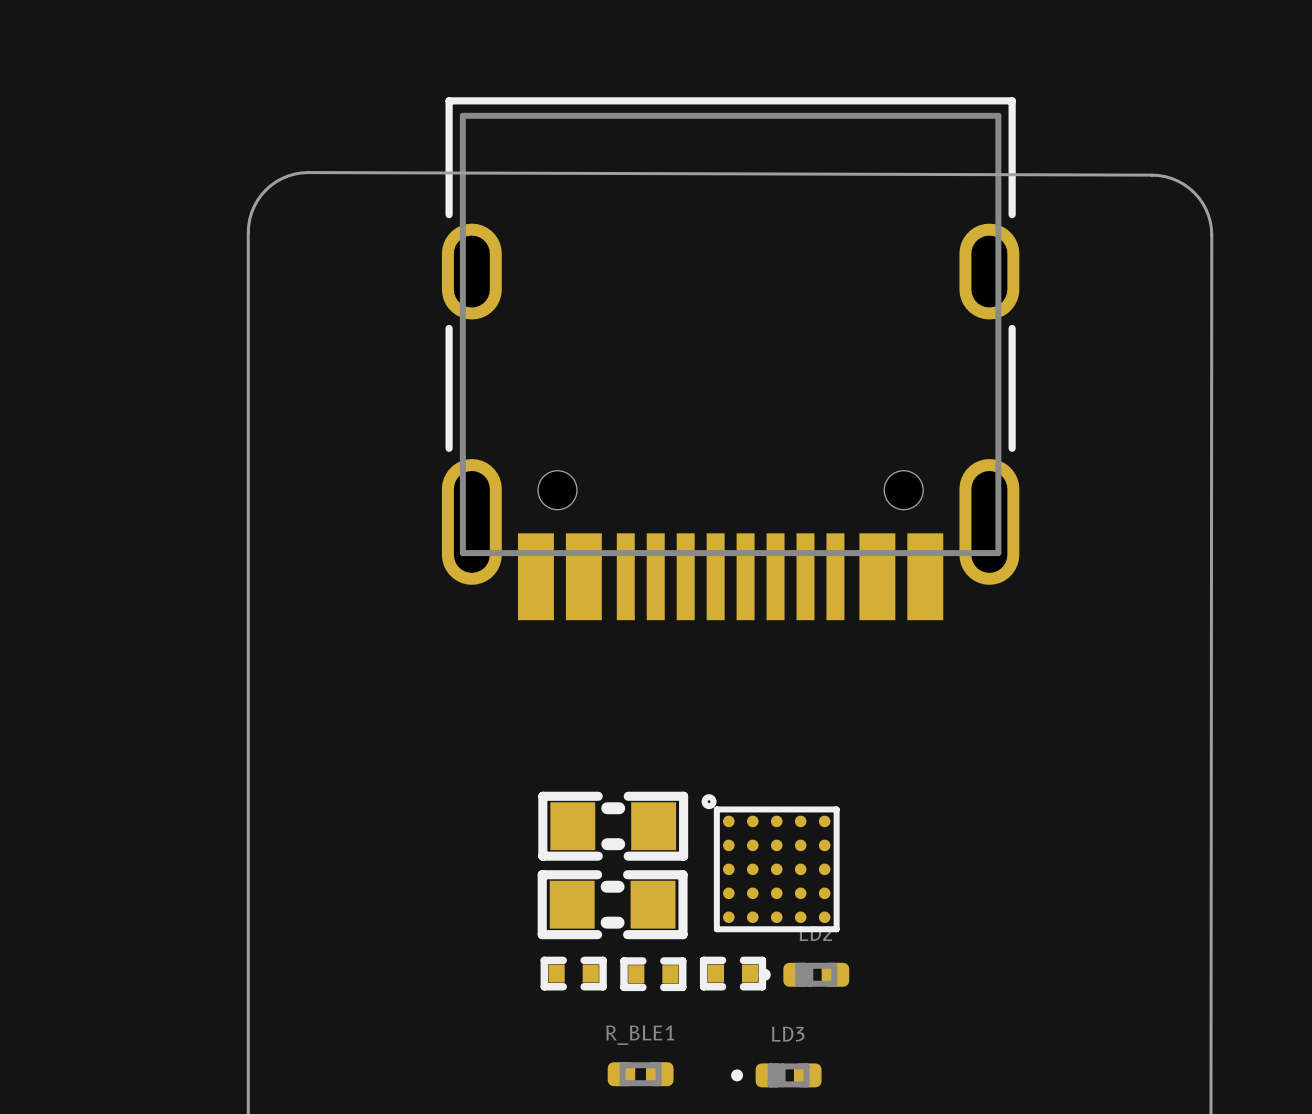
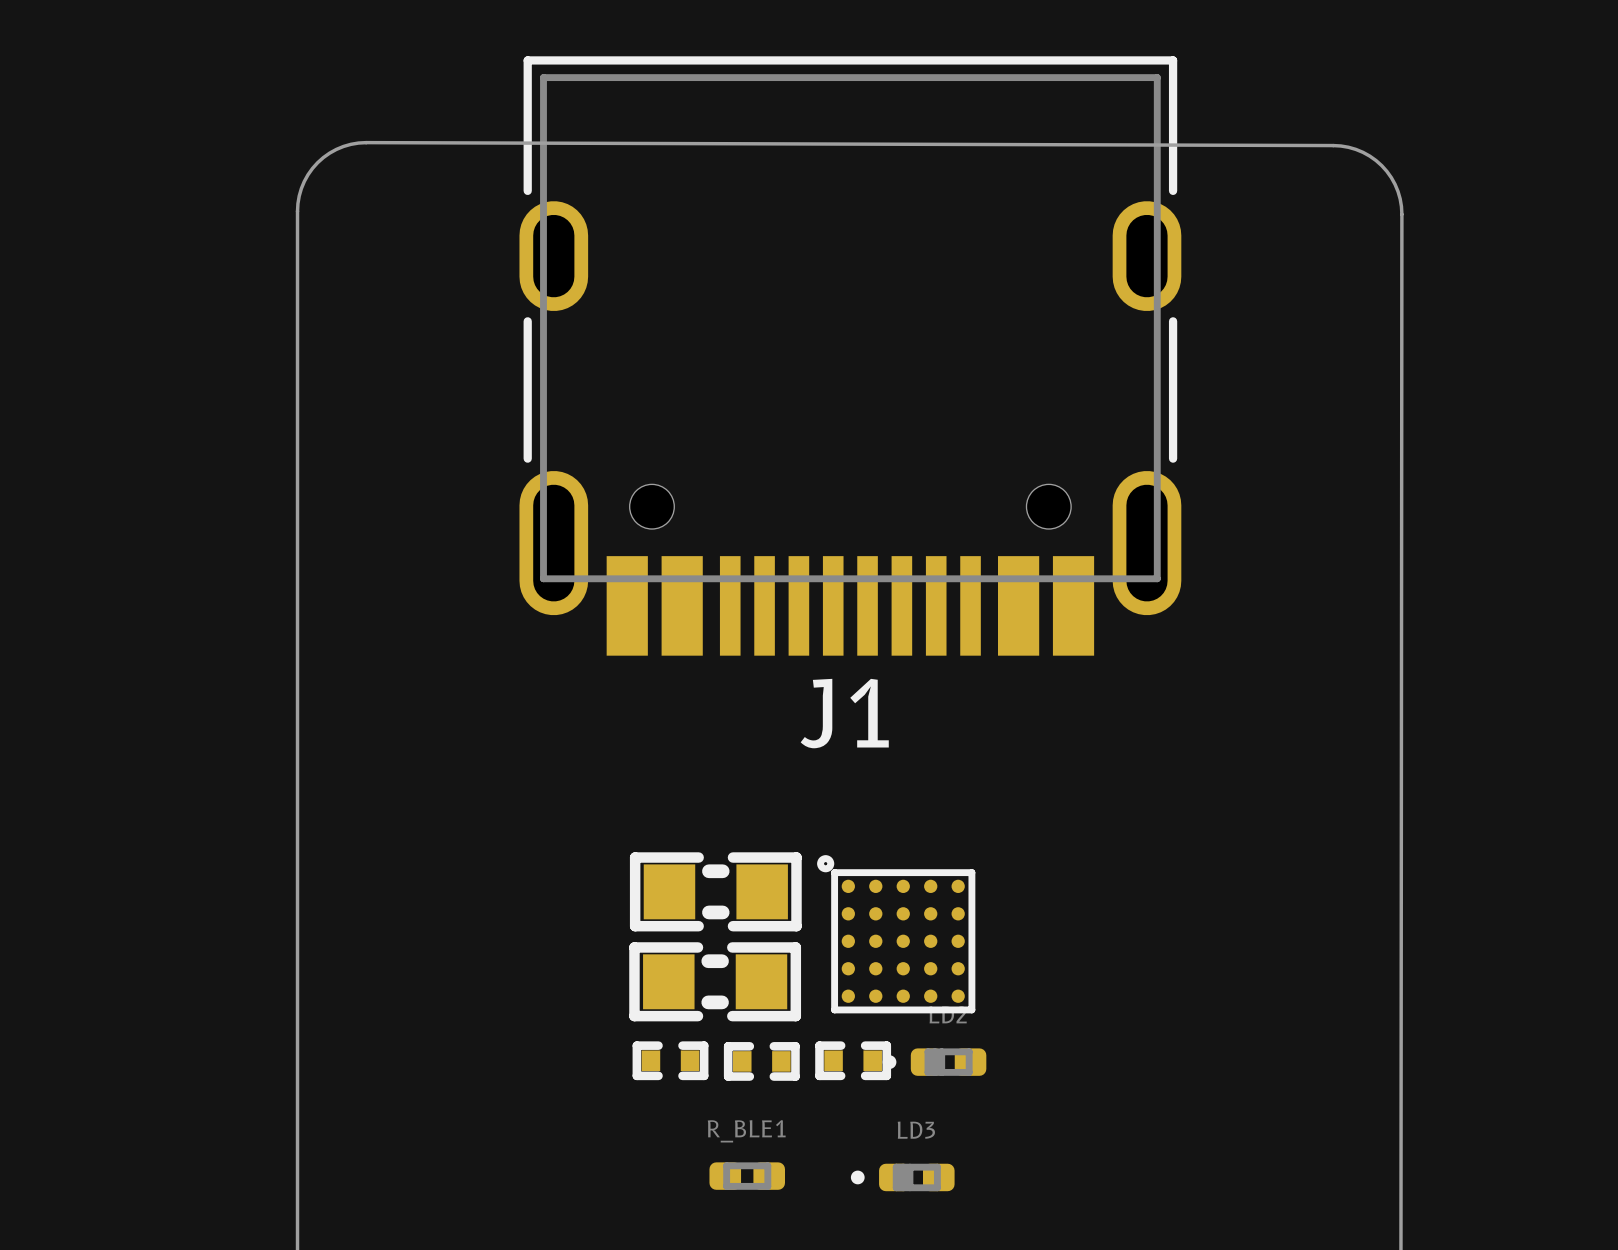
J1 name: none -> J1 (844, 713)

